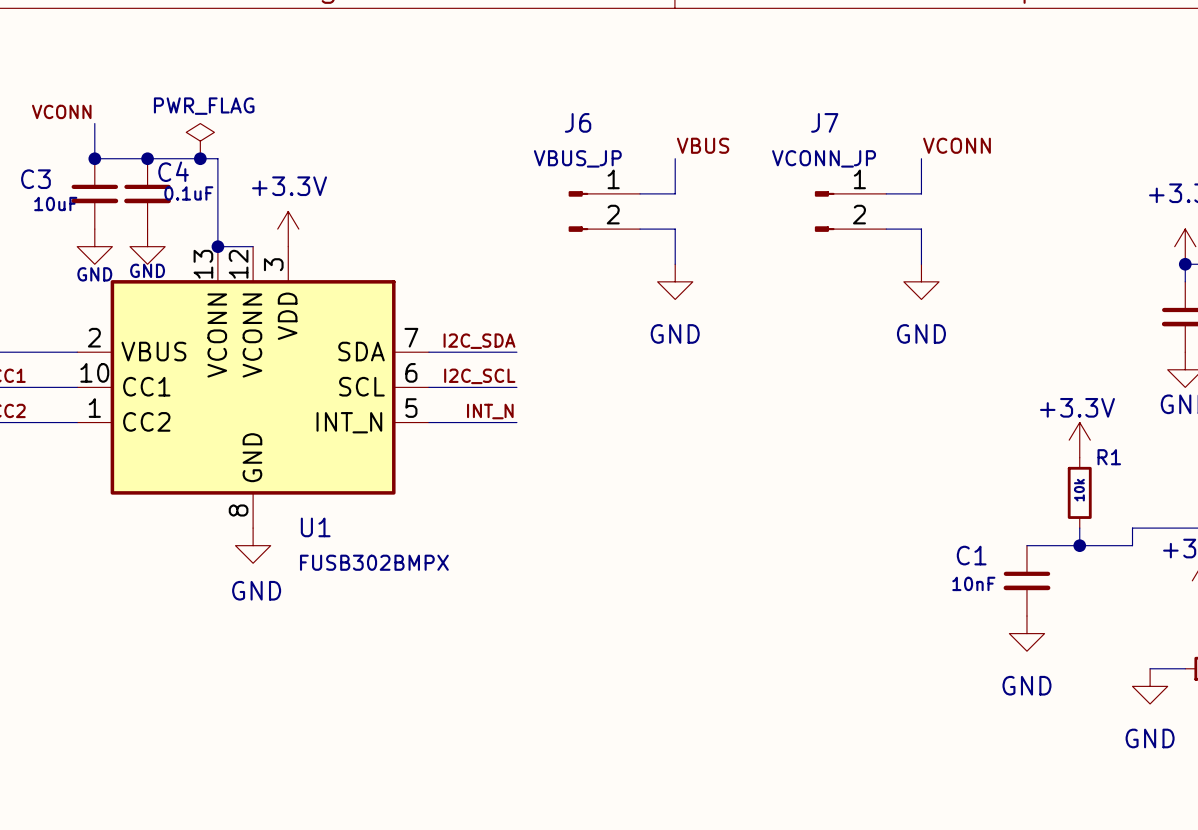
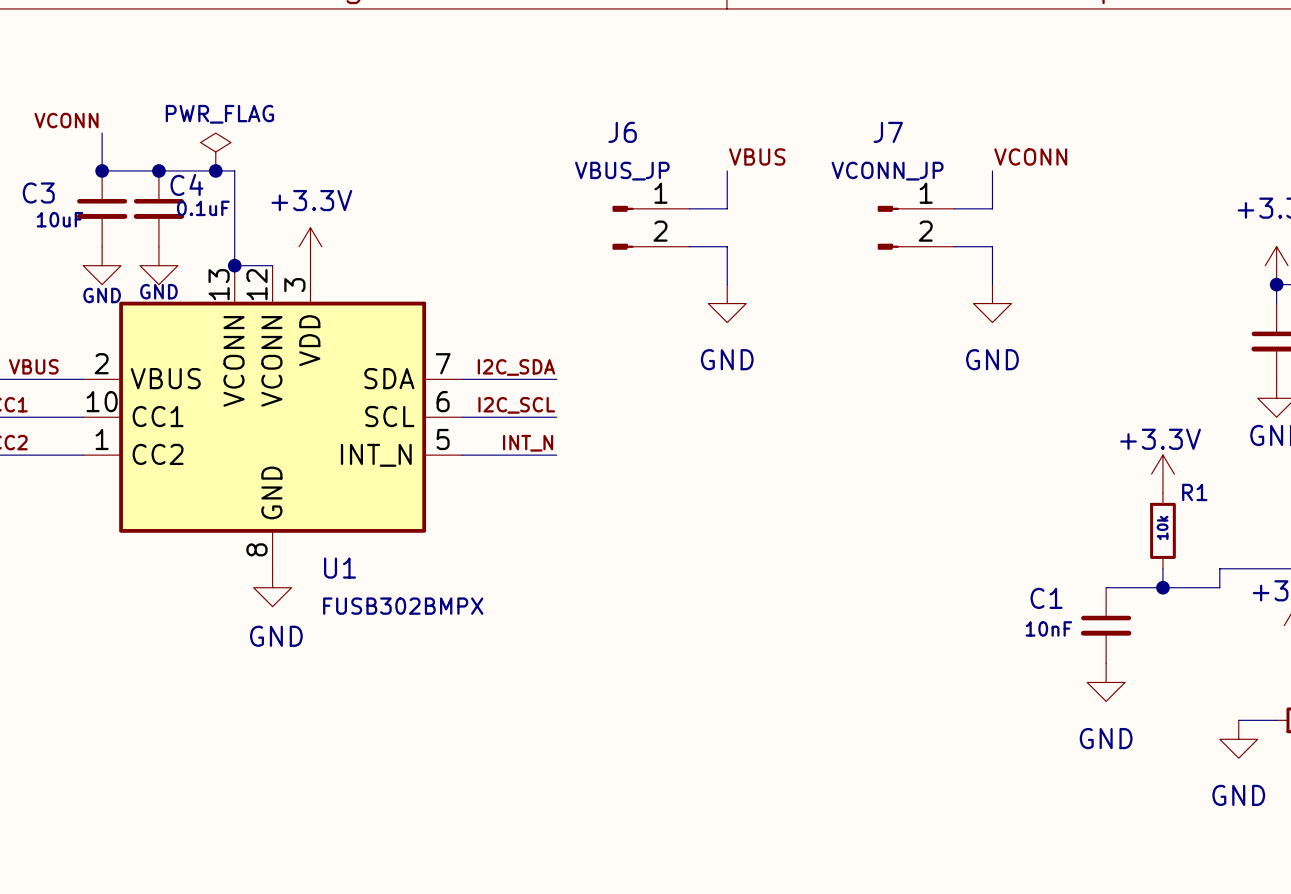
label: none -> VBUS (33, 366)

